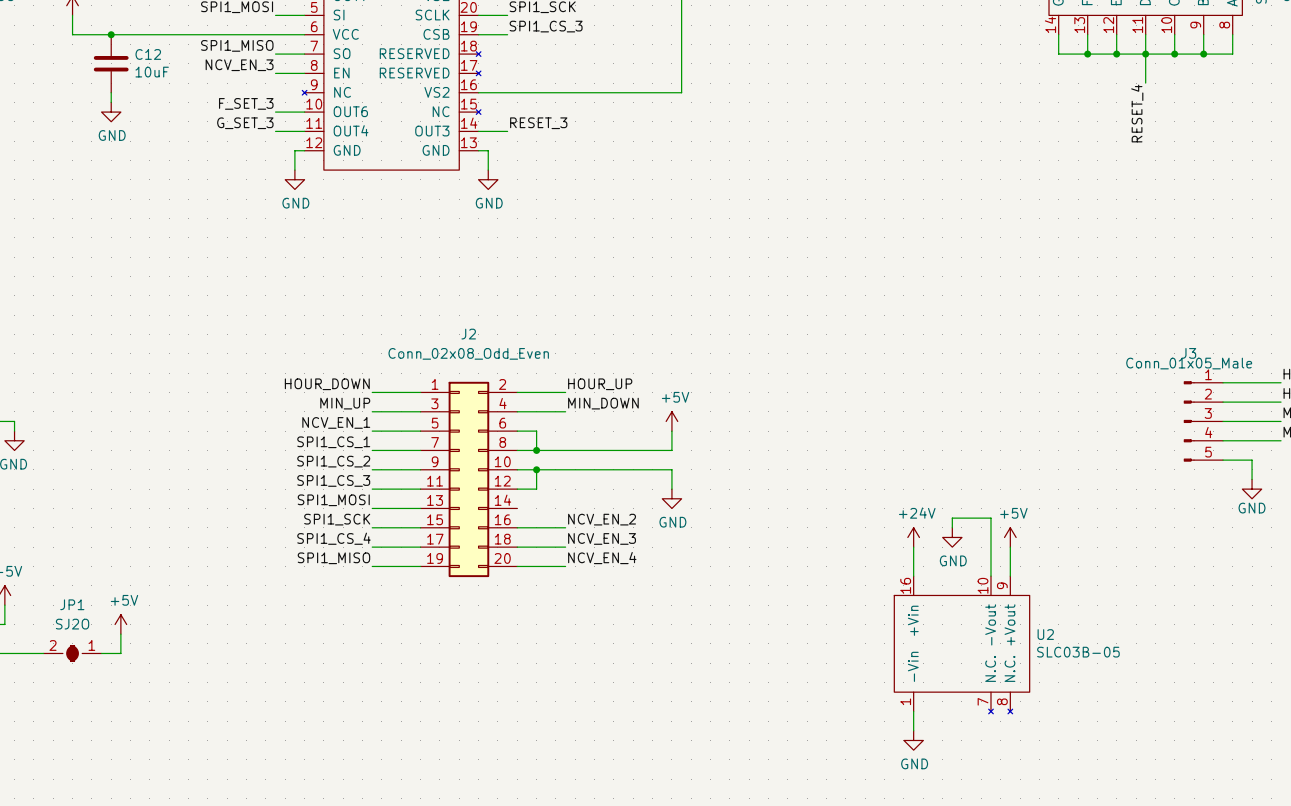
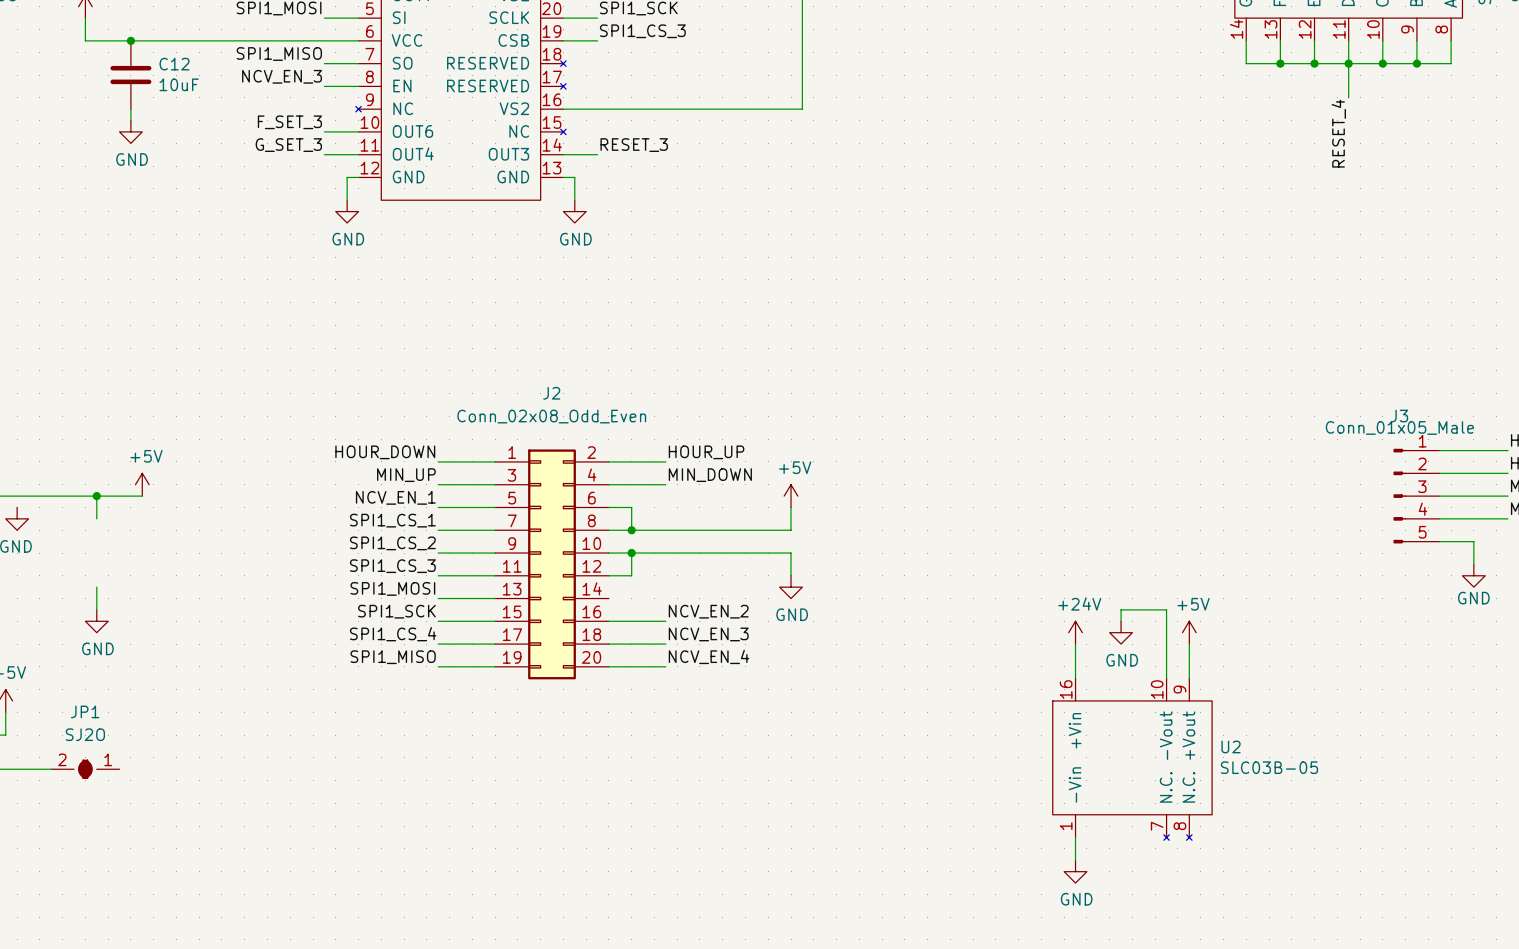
power symbol: none -> +5V (142, 484)
wire: (14, 421) (14, 431) -> (17, 496) (142, 496)
wire: none -> (96, 496) (96, 518)
junction: none -> (96, 496)
wire: none -> (96, 587) (96, 609)
power symbol: none -> GND (96, 621)
power symbol: +5V (120, 624) -> none
wire: (120, 634) (120, 653) (101, 653) -> none

